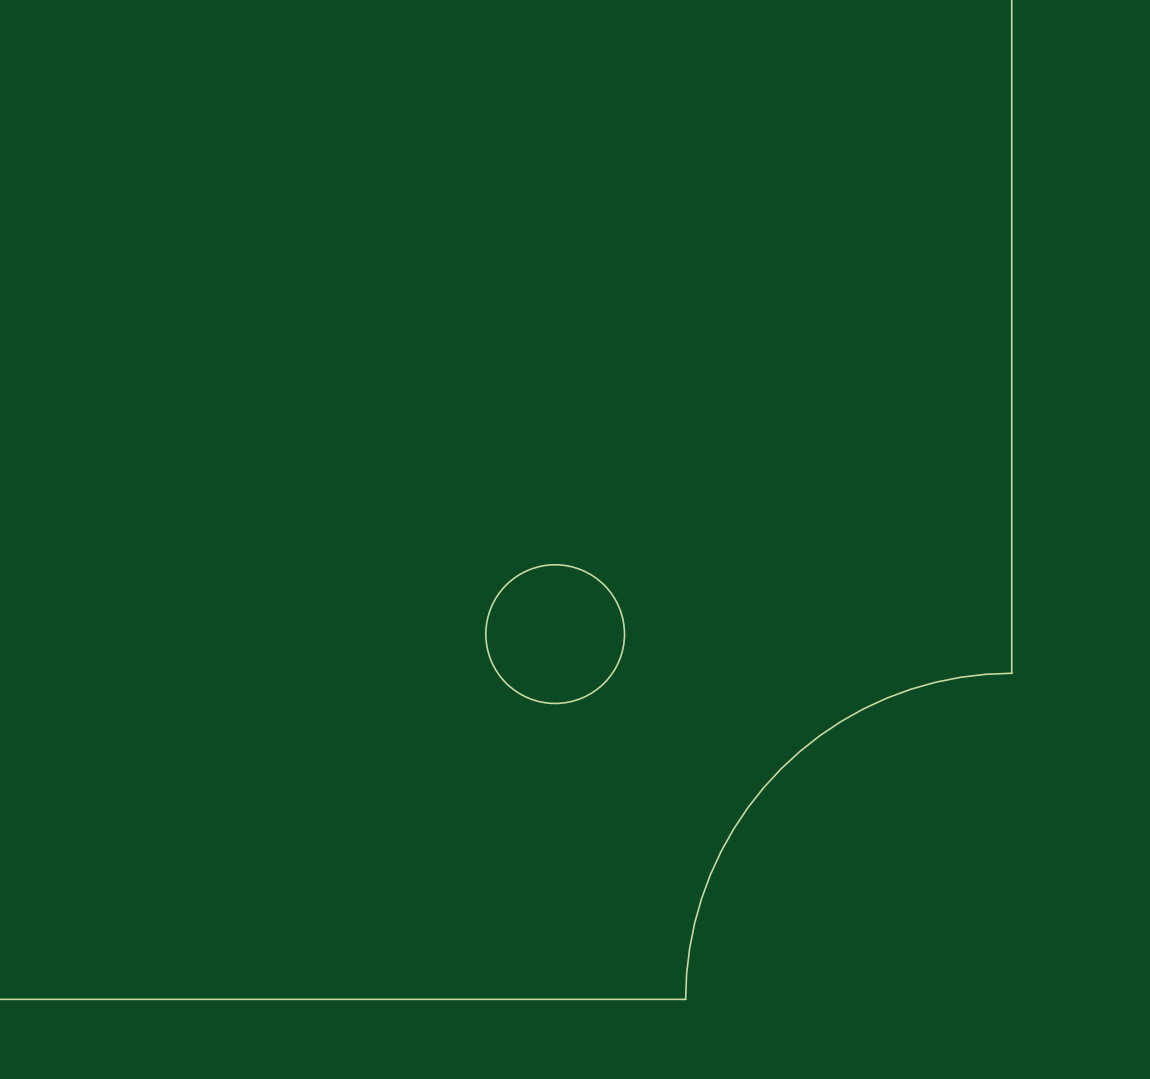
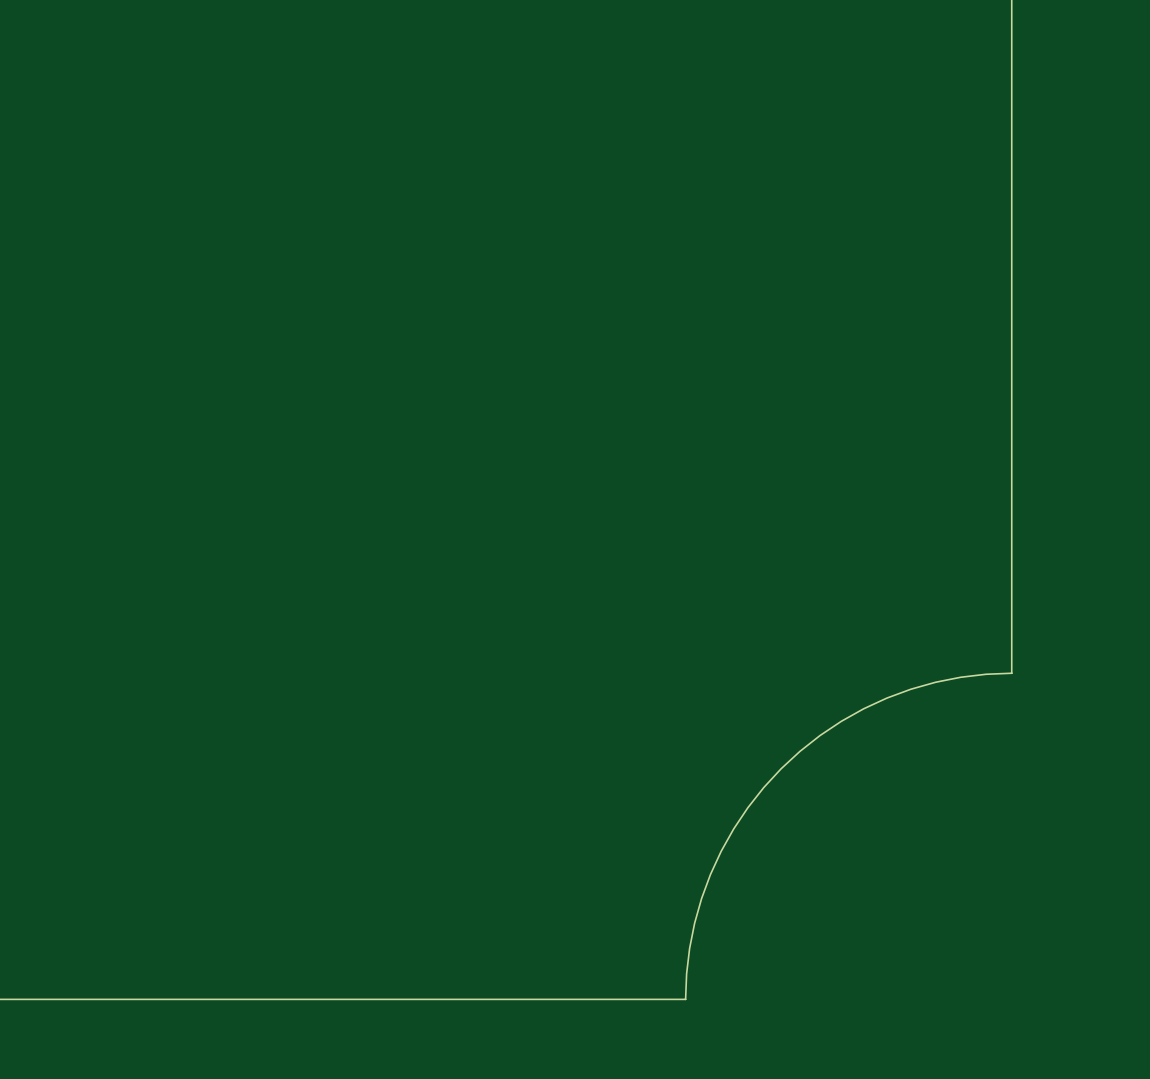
round board edge: [485, 563, 626, 705] -> none

